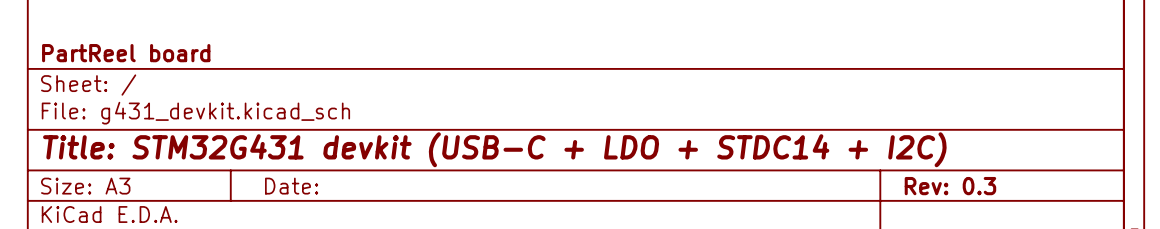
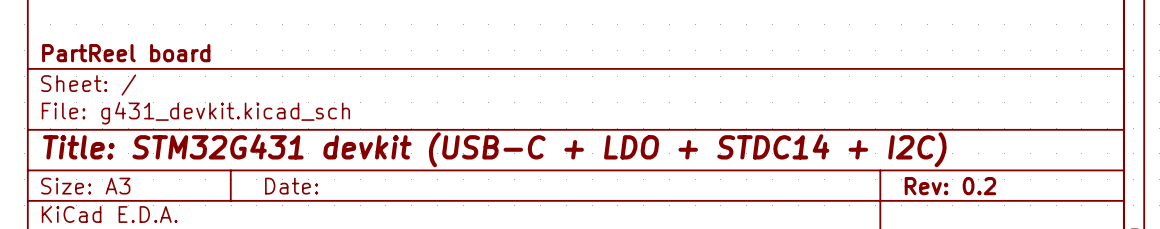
title block: Rev: 0.3 (950, 186) -> Rev: 0.2 (950, 186)

